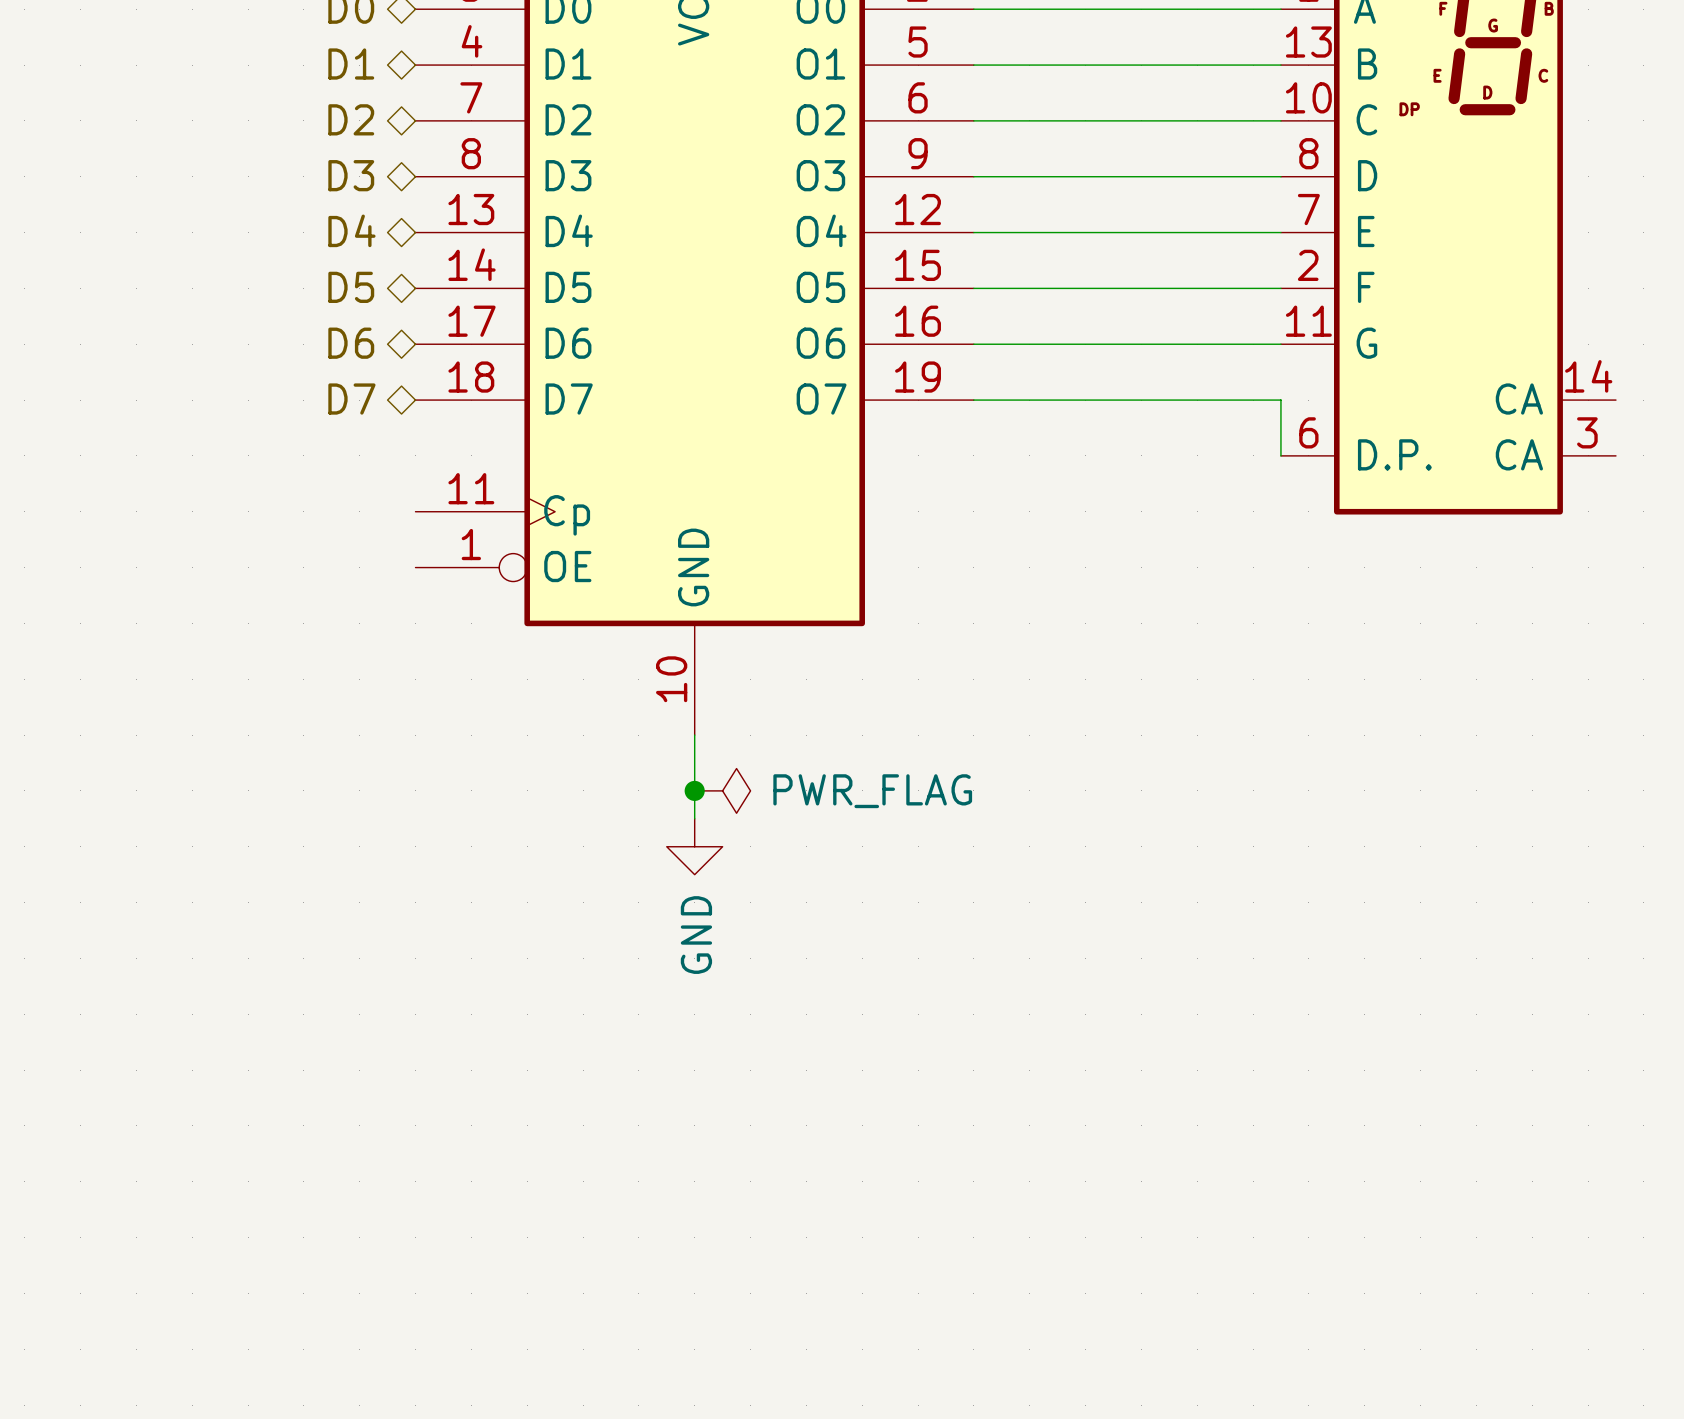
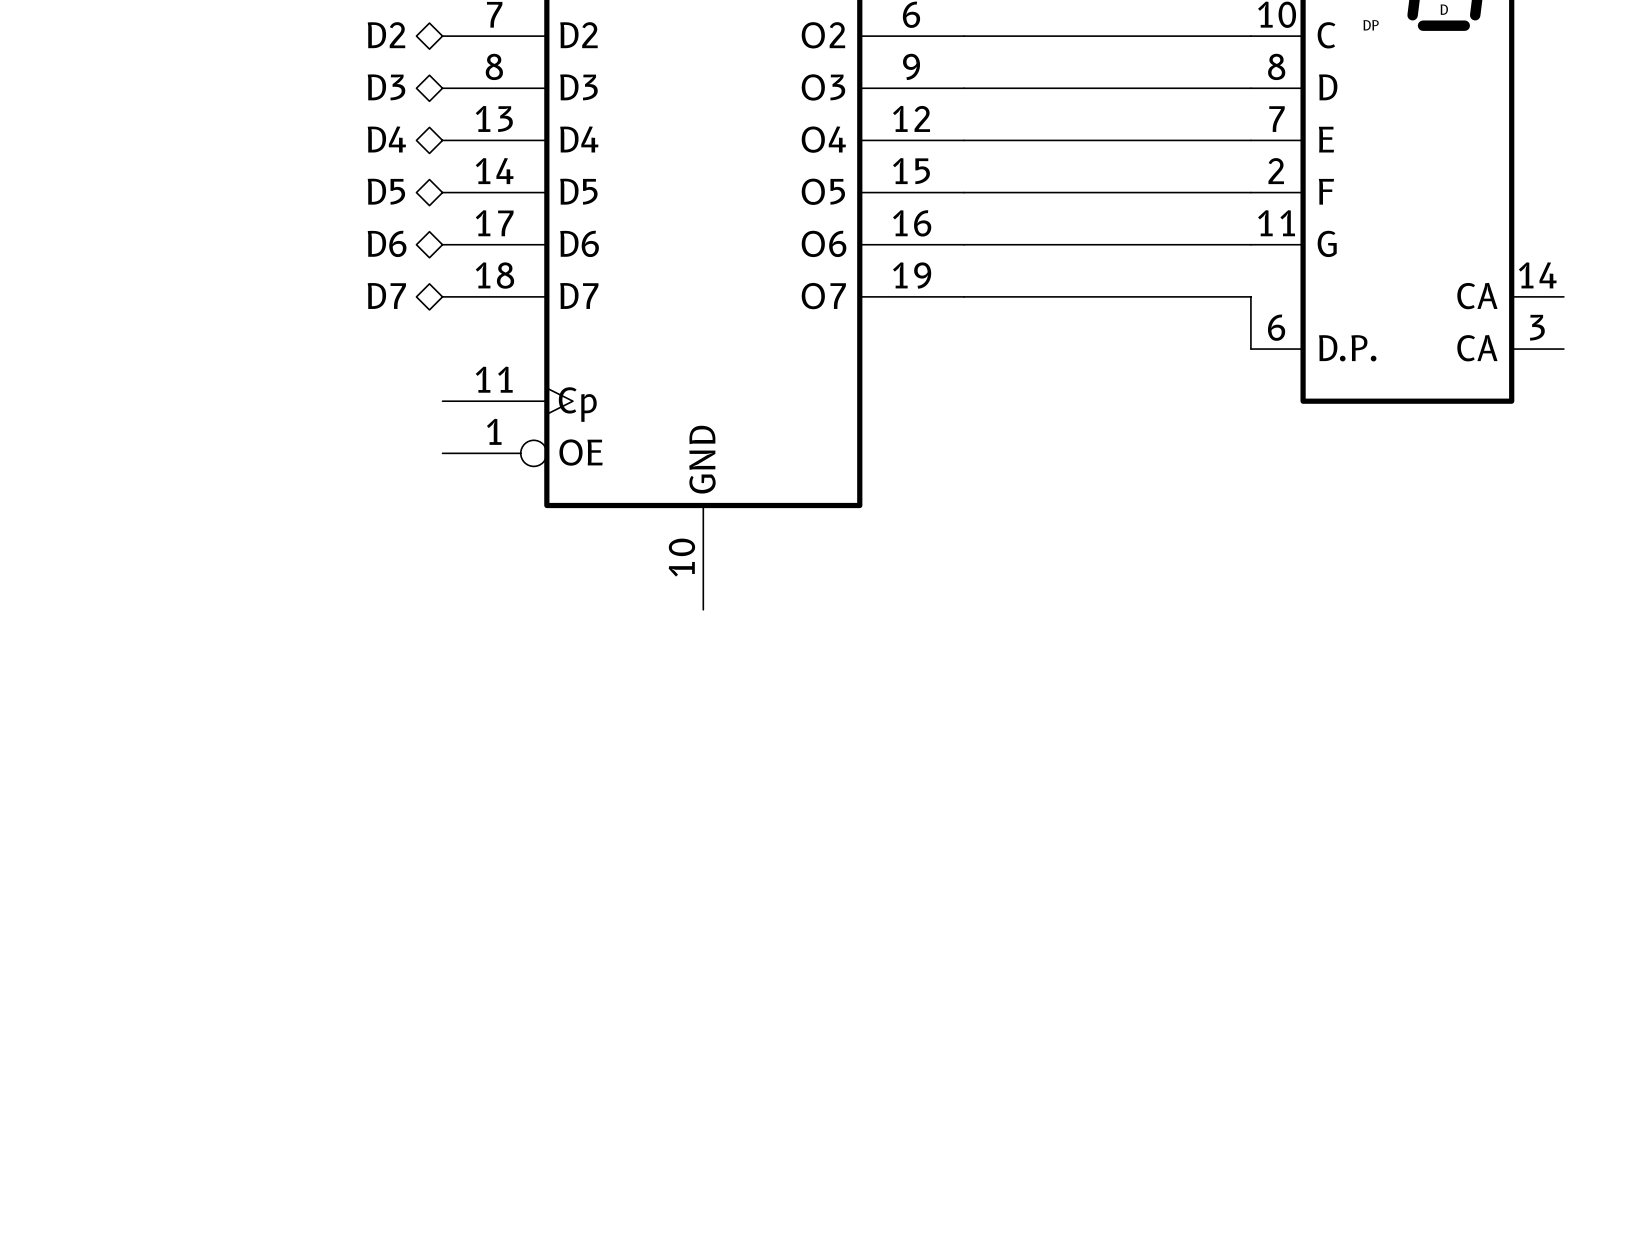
wire: (694, 735) (694, 818) -> none
junction: (694, 790) -> none
power symbol: PWR_FLAG (722, 790) -> none
power symbol: GND (694, 846) -> none

